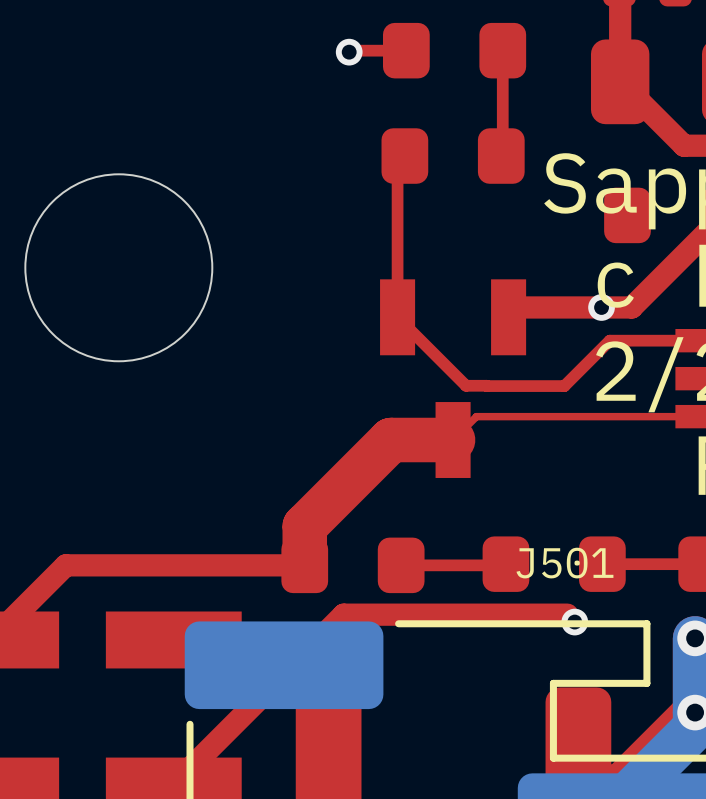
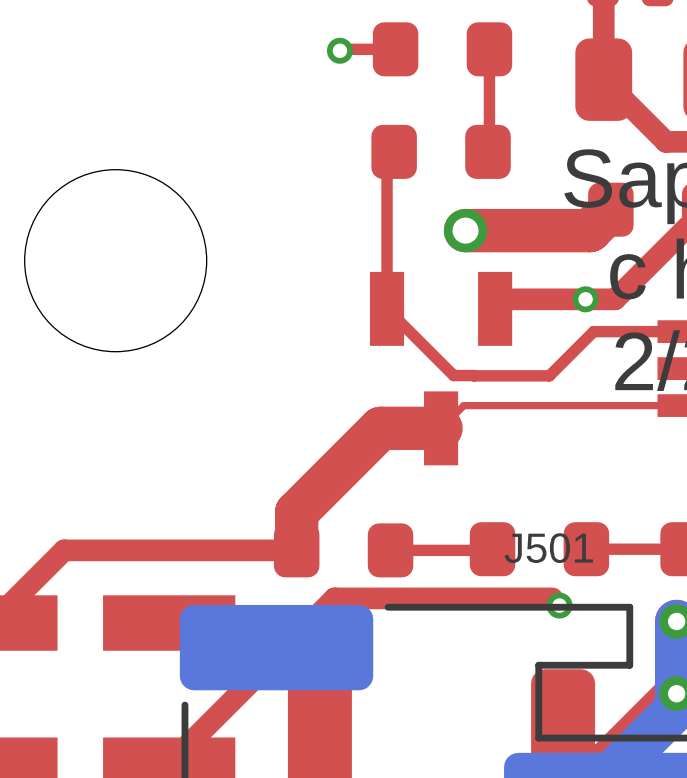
top track: none -> (610, 209) (589, 230) (465, 230)
via: none -> (465, 230)

